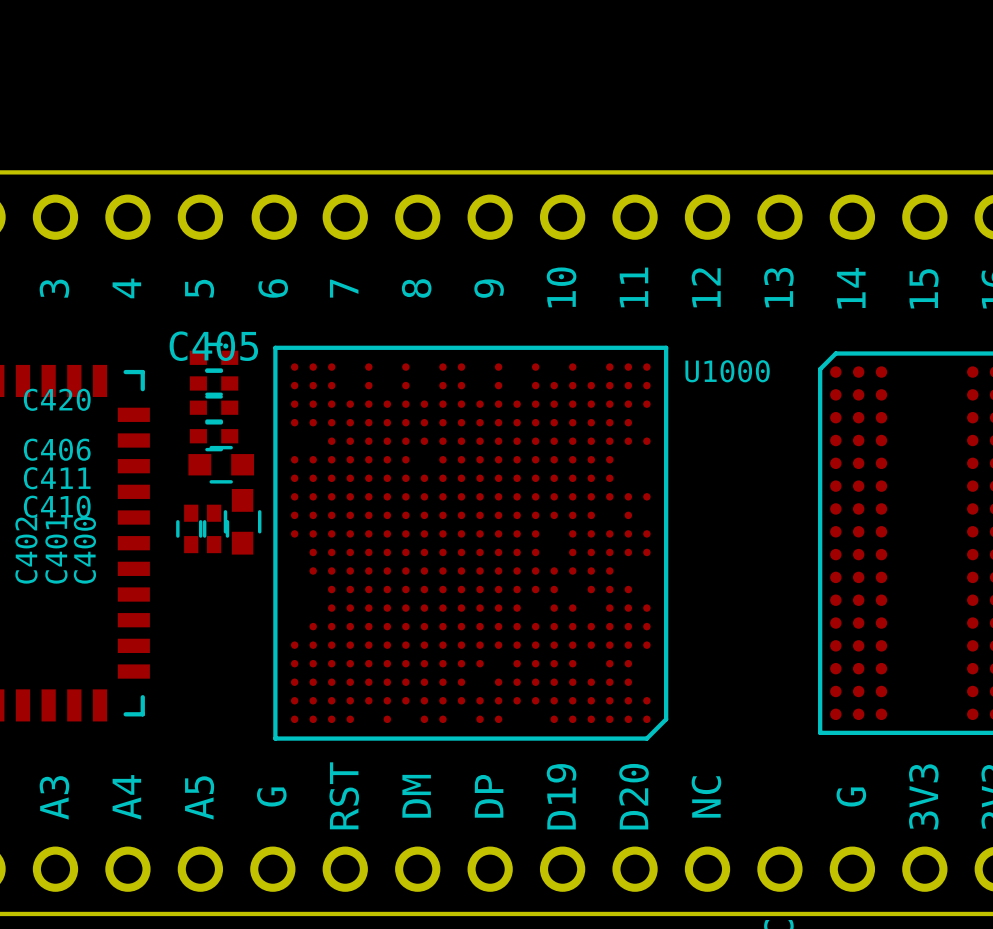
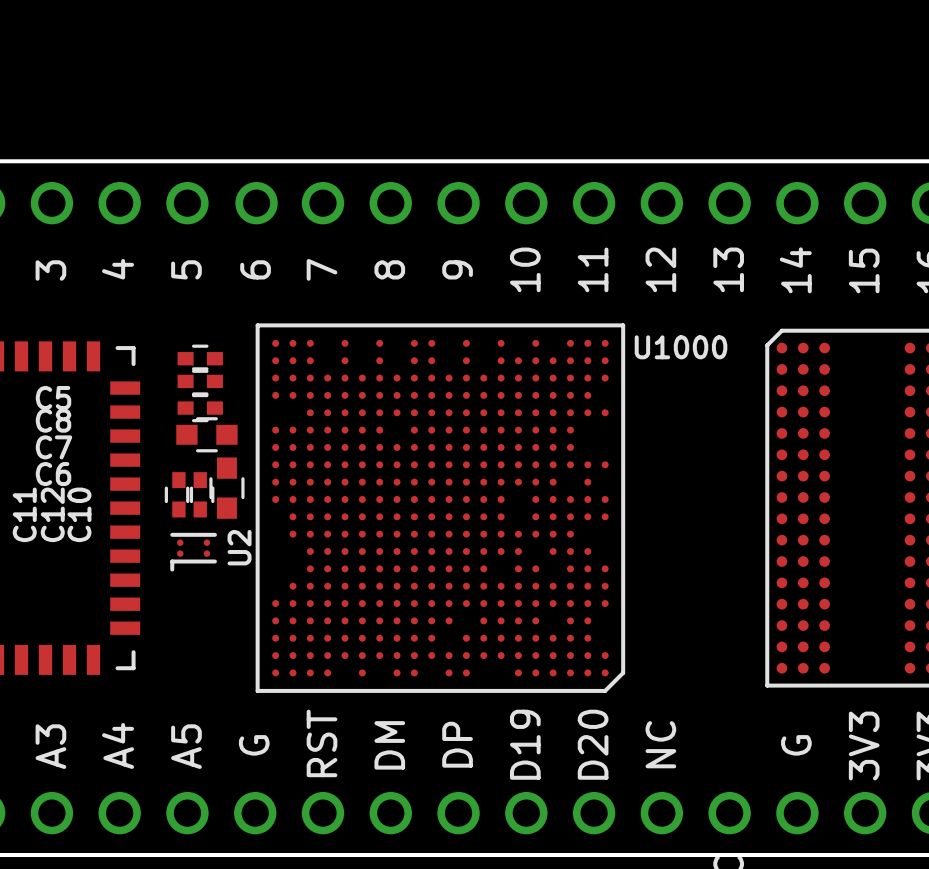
C405 name: C405 (213, 346) -> C5 (53, 398)
C420: (214, 357) -> none
C406 name: C406 (57, 449) -> C8 (53, 420)
C411 name: C411 (57, 478) -> C7 (53, 447)
C410 name: C410 (57, 506) -> C6 (53, 474)
C402 name: C402 (26, 550) -> C11 (24, 514)
C401 name: C401 (56, 550) -> C12 (52, 514)
C400 name: C400 (84, 550) -> C10 (79, 514)
U2: none -> (193, 552)

